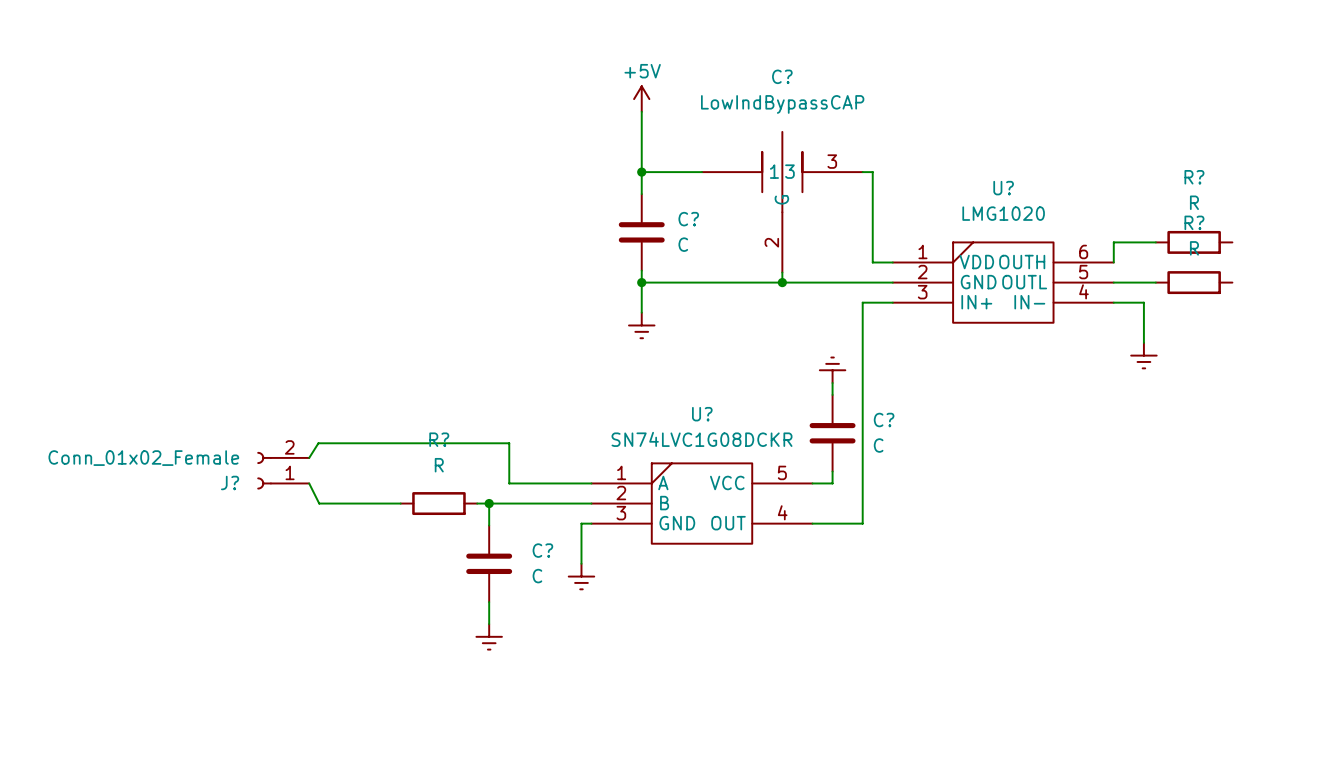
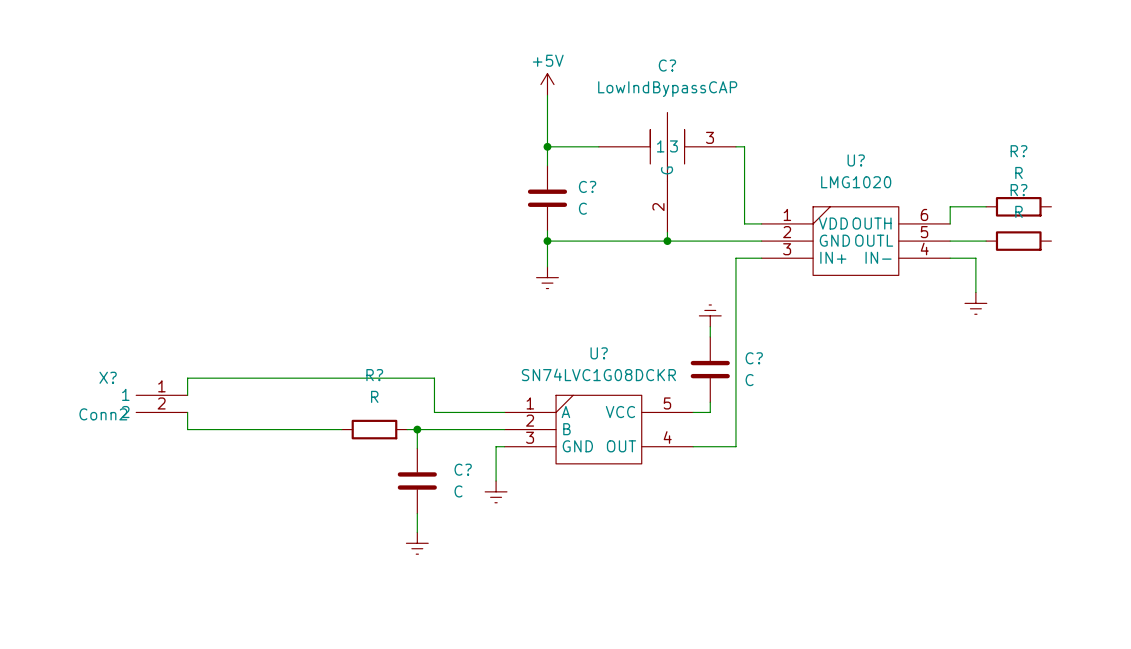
wire: (318, 443) (309, 457) -> (271, 378) (187, 378) (187, 395)
J?: Conn_01x02_Female (283, 470) -> none
X?: none -> Conn2 (161, 403)
wire: (309, 483) (319, 503) -> (187, 412) (187, 429) (272, 429)

